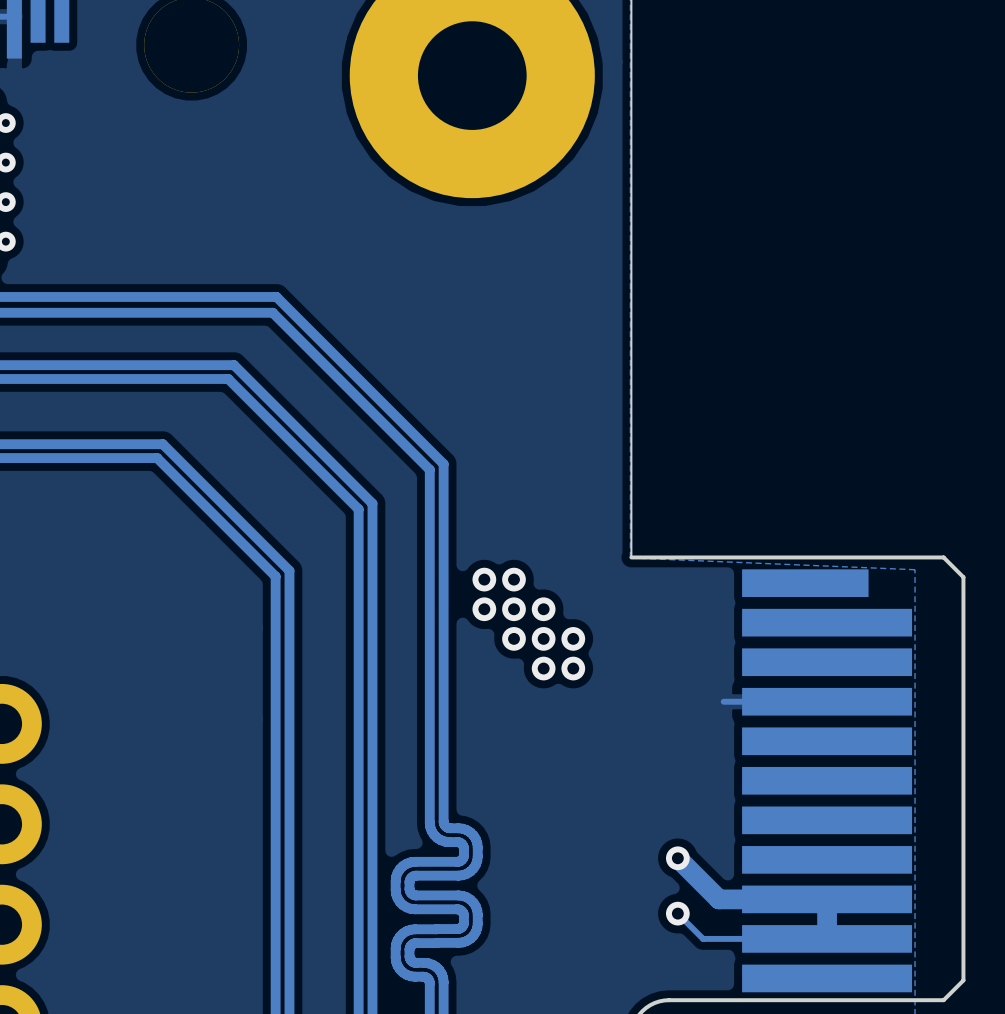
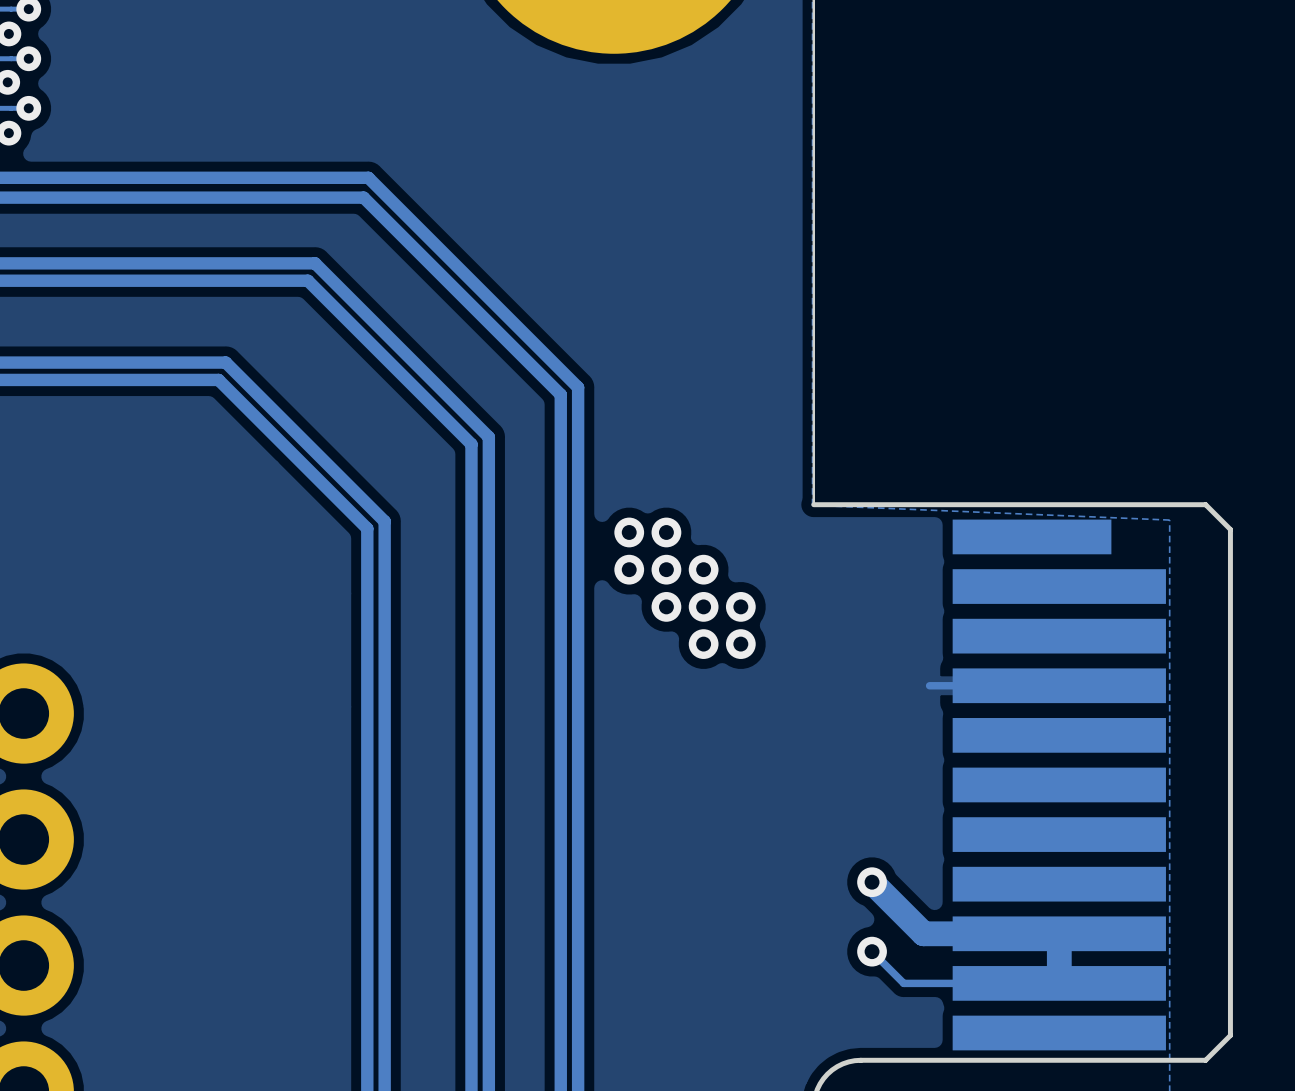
track: (443, 821) (447, 827) (462, 828) (470, 832) (475, 839) (477, 847) (475, 864) (466, 873) (458, 875) (414, 875) (409, 880) (409, 890) (413, 894) (462, 895) (473, 902) (477, 910) (477, 927) (473, 935) (466, 940) (458, 942) (416, 943) (410, 946) (410, 960) (414, 962) (428, 963) (436, 967) (441, 973) (443, 982) -> (578, 836) (578, 1037)
track: (429, 822) (431, 831) (437, 837) (444, 841) (458, 842) (462, 844) (463, 858) (457, 861) (415, 861) (406, 863) (397, 872) (395, 889) (399, 901) (410, 908) (457, 909) (462, 911) (463, 922) (461, 927) (436, 929) -> (560, 837) (560, 1039)
track: (436, 929) (406, 931) (399, 936) (396, 944) (396, 961) (399, 969) (410, 976) (426, 977) (429, 983) -> none

